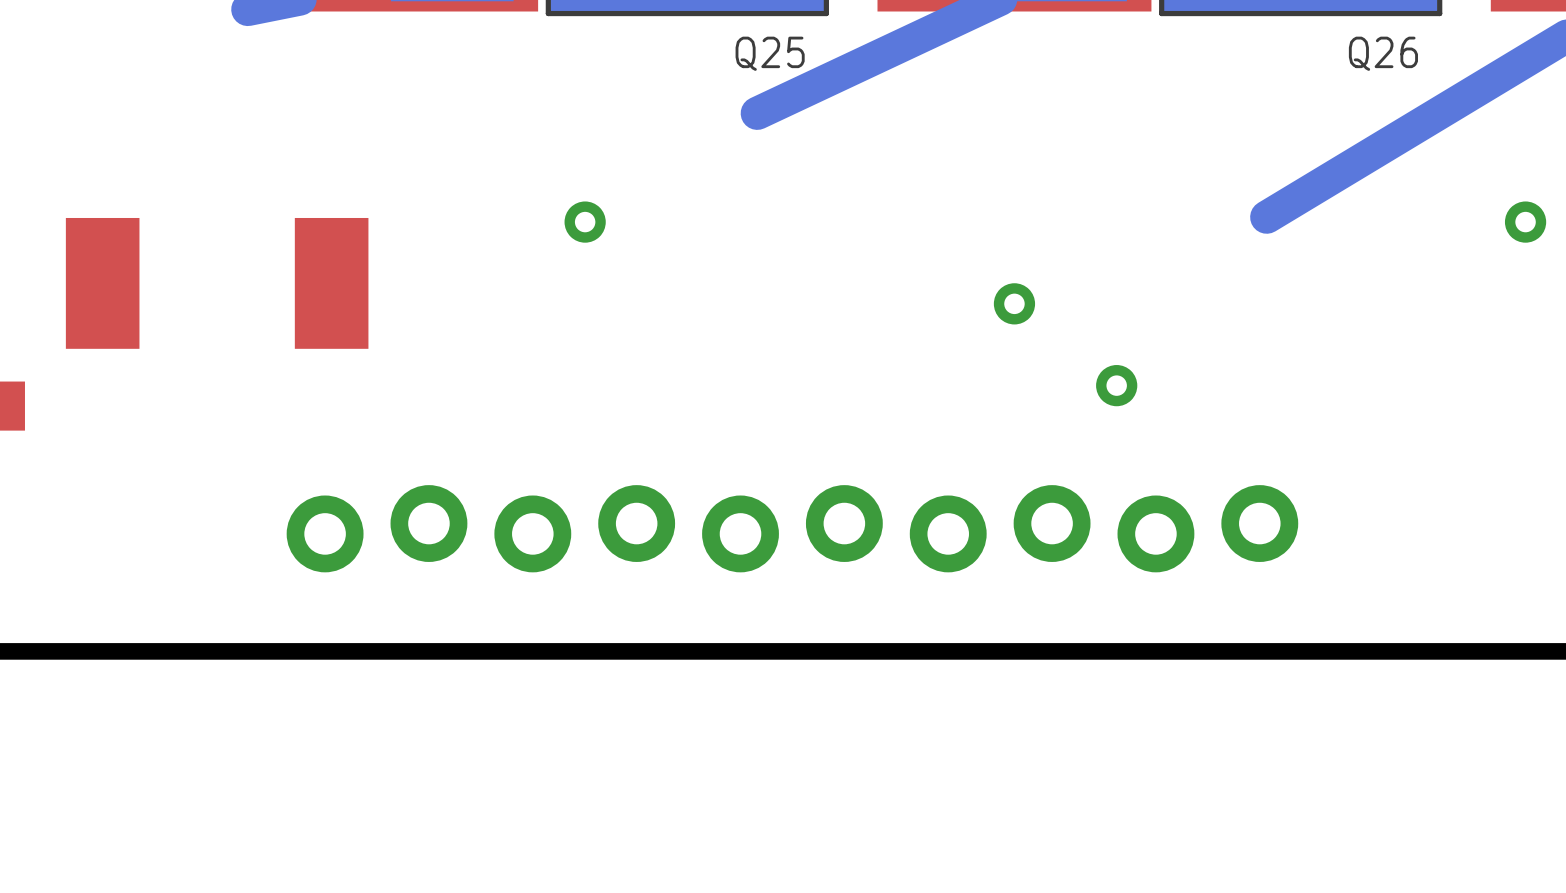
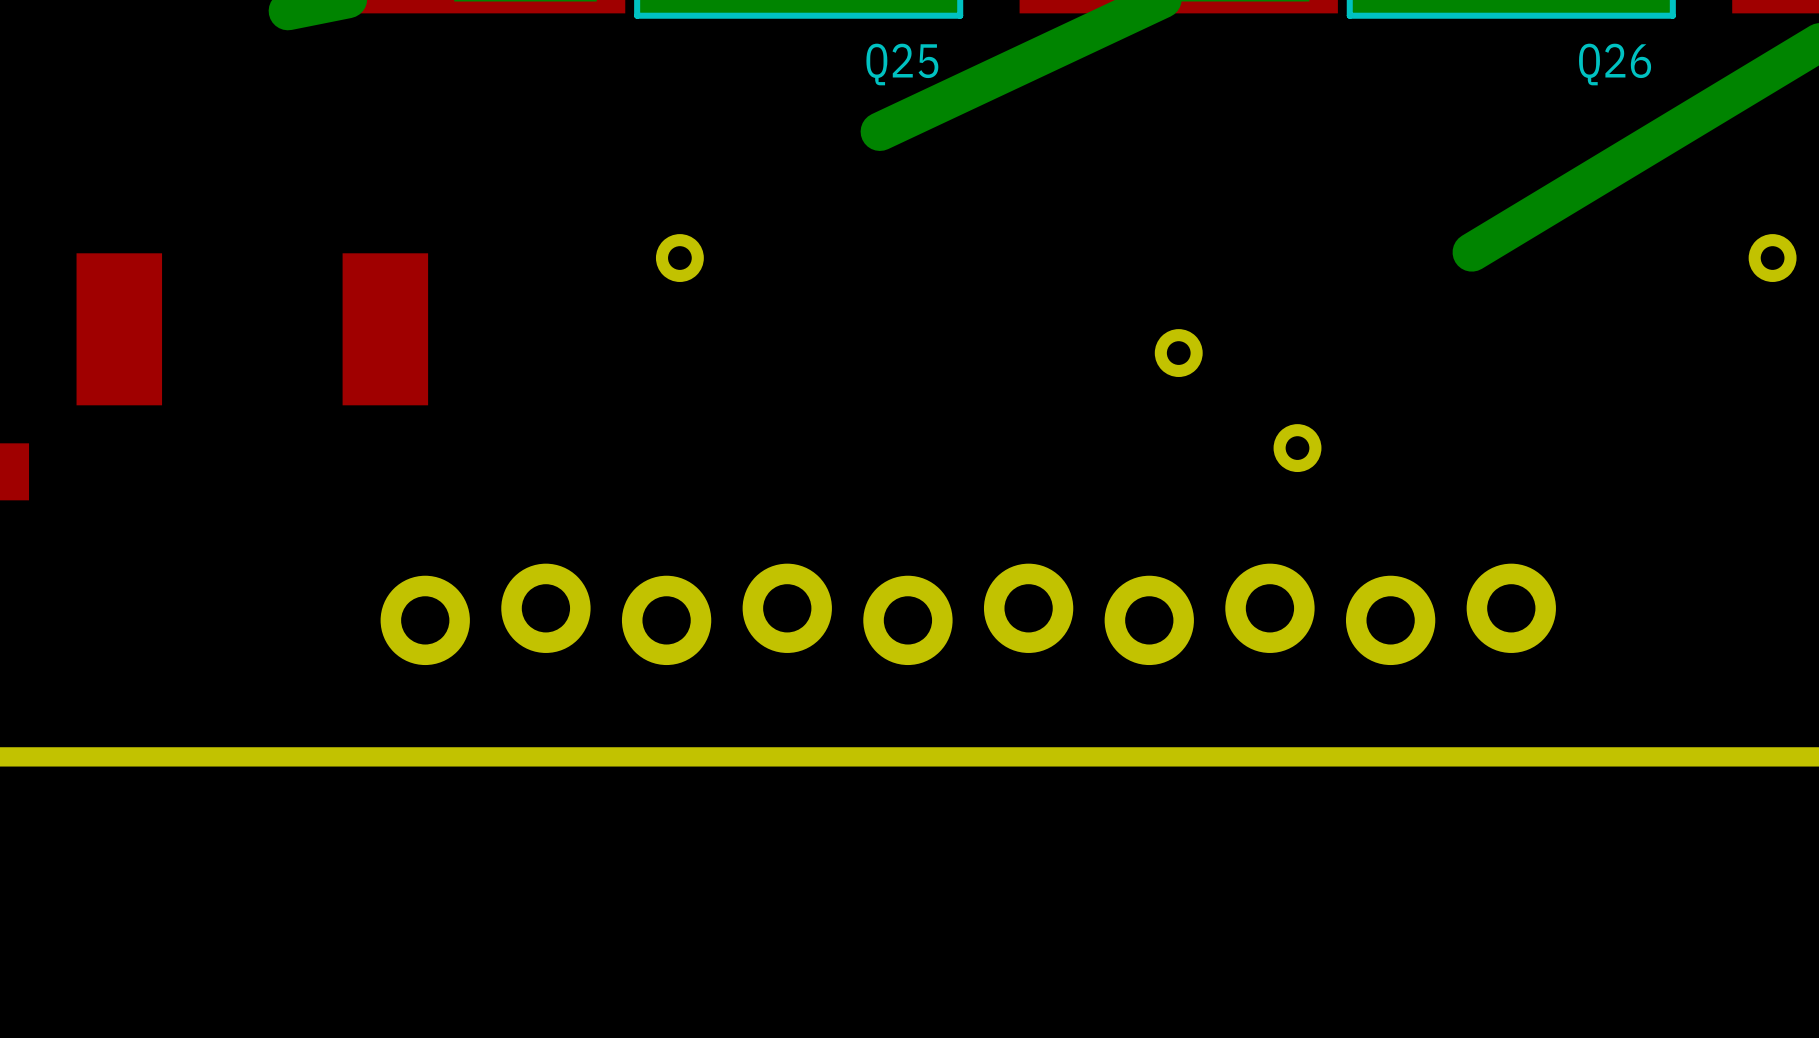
part position: (792, 528) -> (968, 614)

